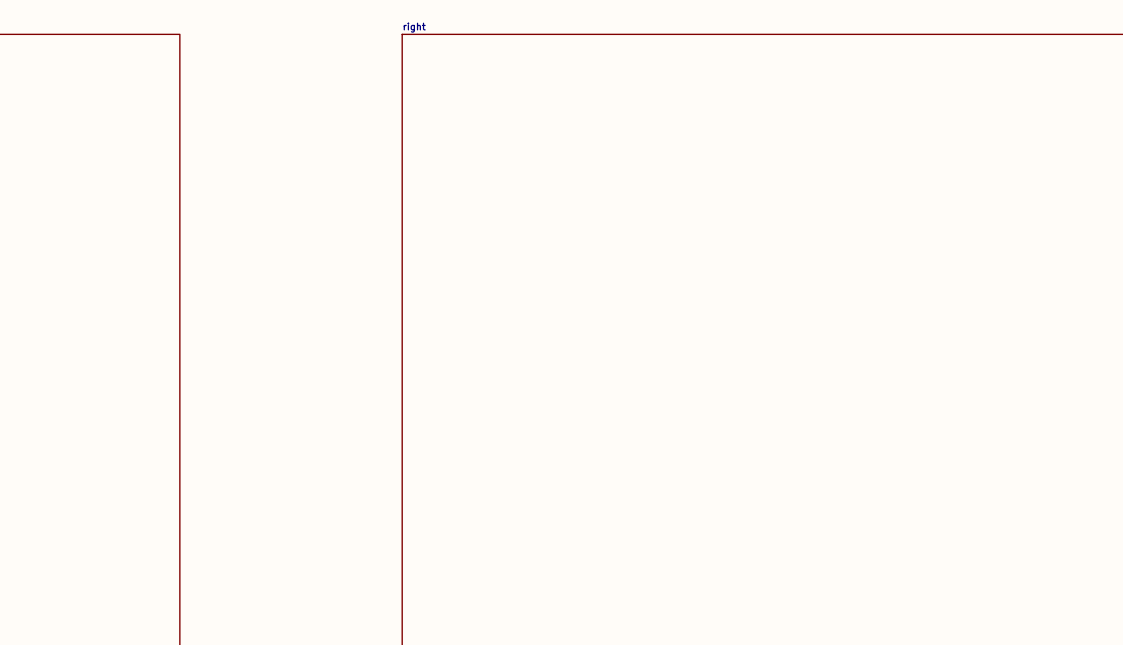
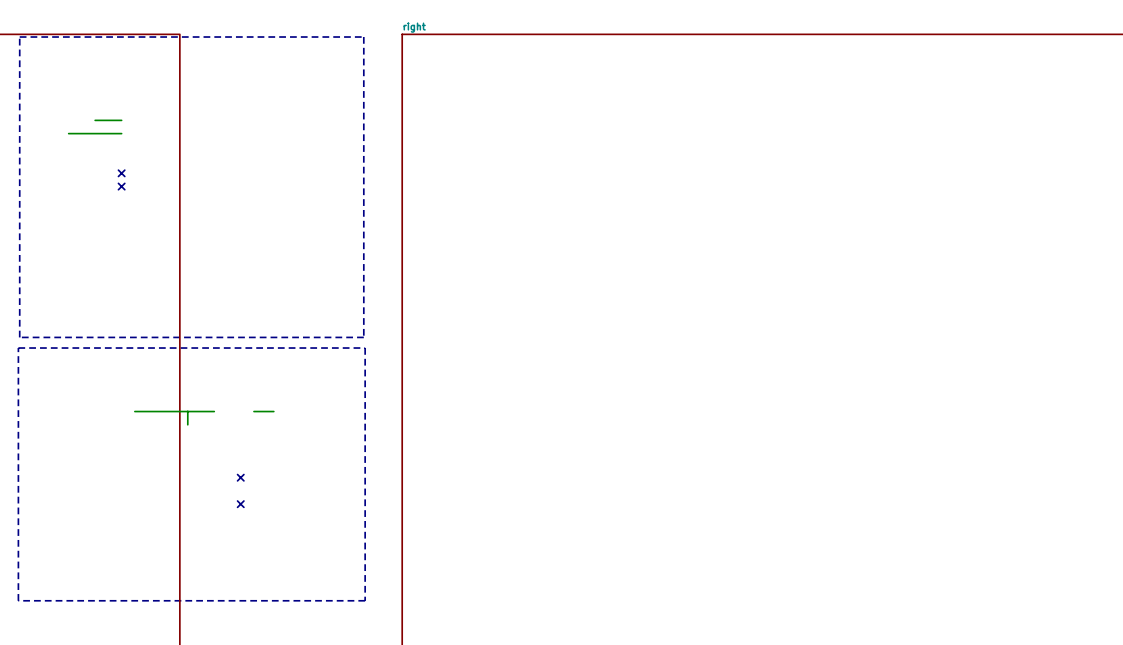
line: none -> (19, 37) (363, 37) (363, 337) (19, 337) (19, 37)
wire: none -> (95, 120) (121, 120)
wire: none -> (68, 133) (121, 133)
no-connect mark: none -> (121, 173)
no-connect mark: none -> (121, 186)
line: none -> (18, 348) (365, 348) (365, 600) (18, 600) (18, 348)
wire: none -> (134, 411) (214, 411)
wire: none -> (187, 411) (187, 424)
wire: none -> (253, 411) (273, 411)
no-connect mark: none -> (240, 477)
no-connect mark: none -> (240, 504)

